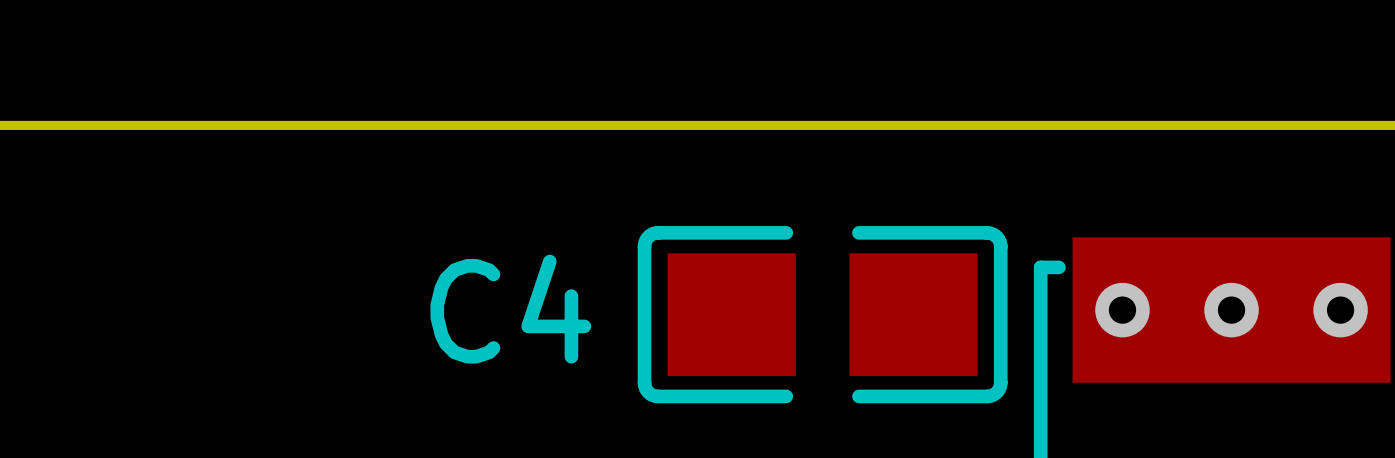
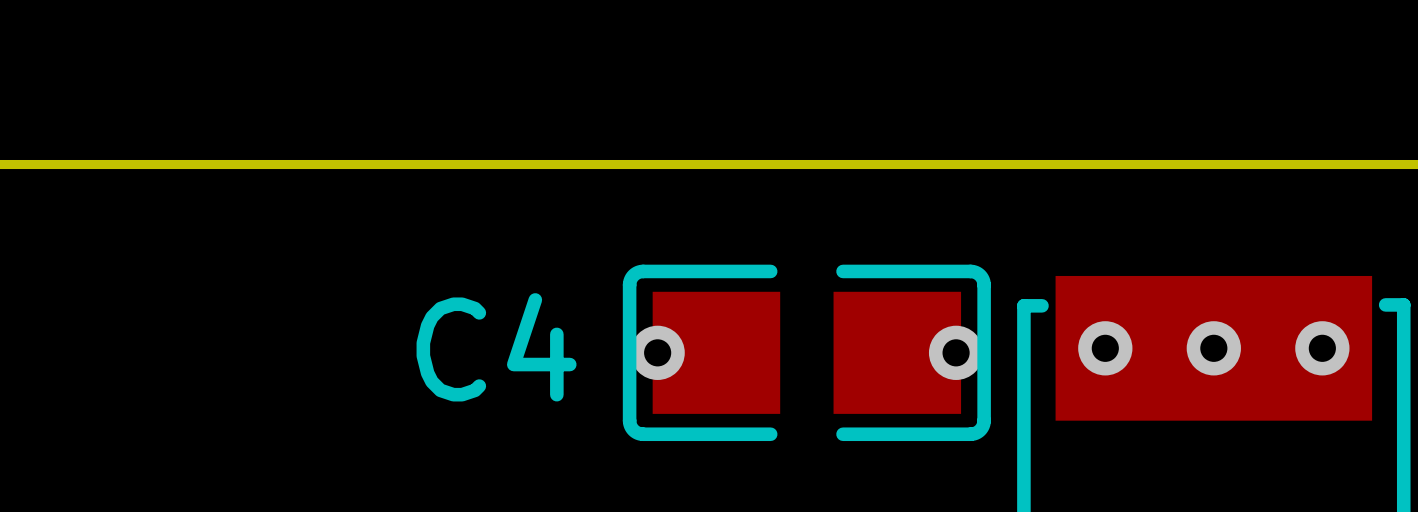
via: none -> (657, 352)
via: none -> (956, 352)

